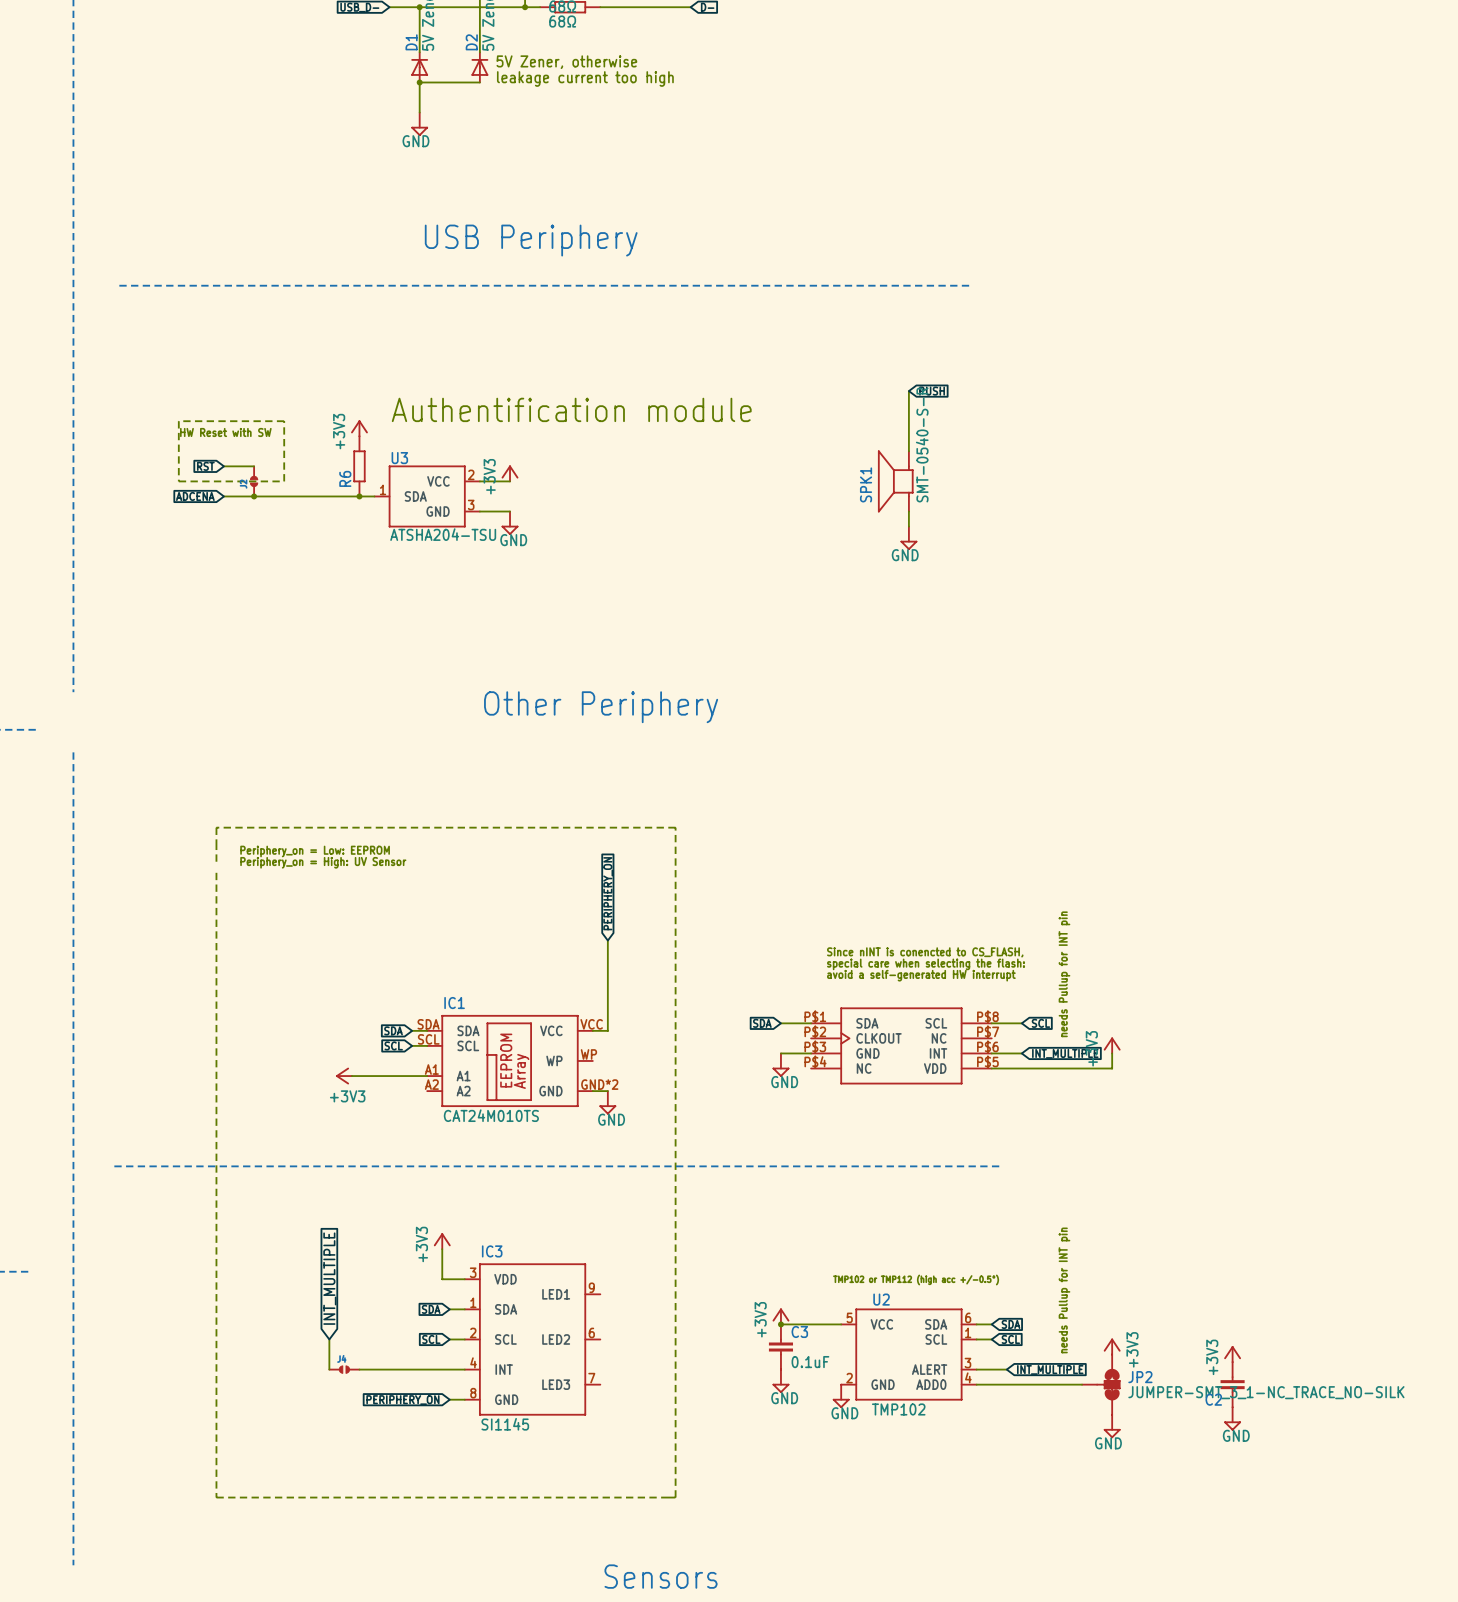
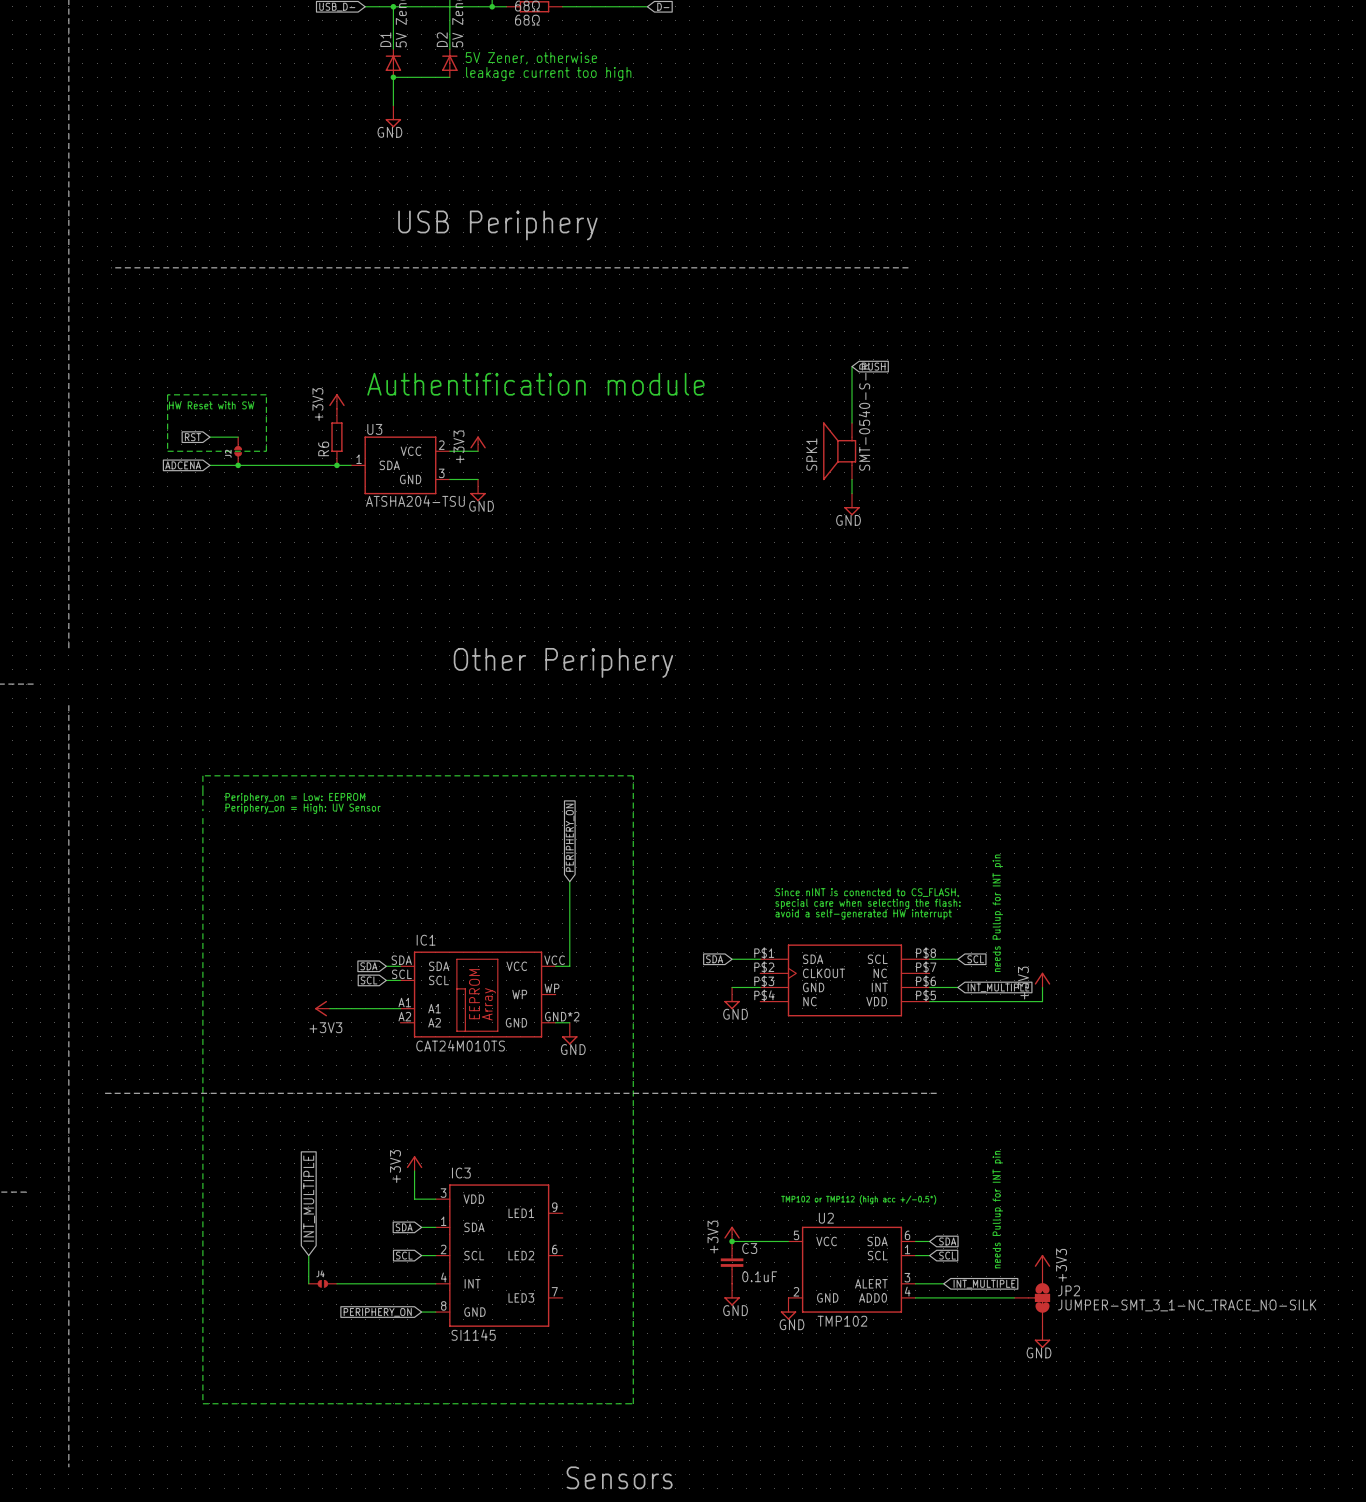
power symbol: +3V3 (1232, 1354) -> none
C2: (1232, 1384) -> none
power symbol: GND (1232, 1418) -> none

